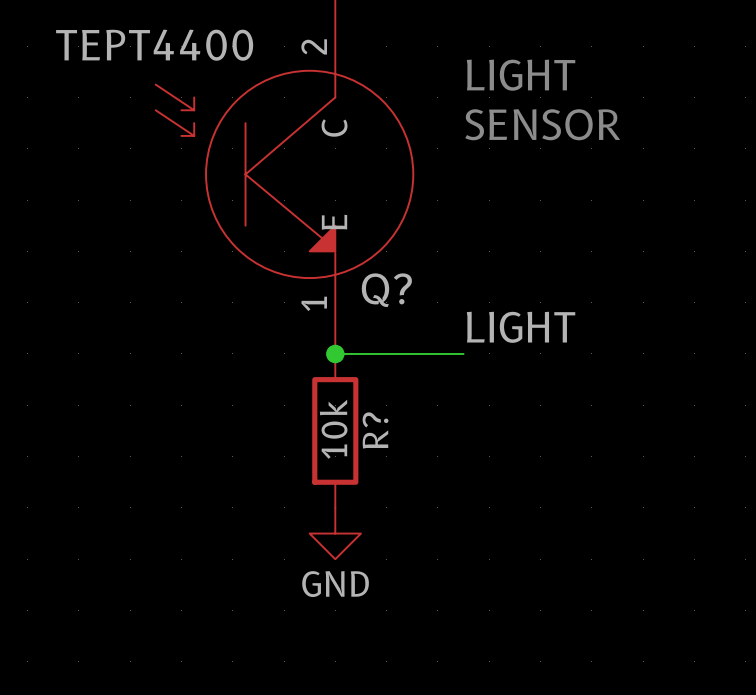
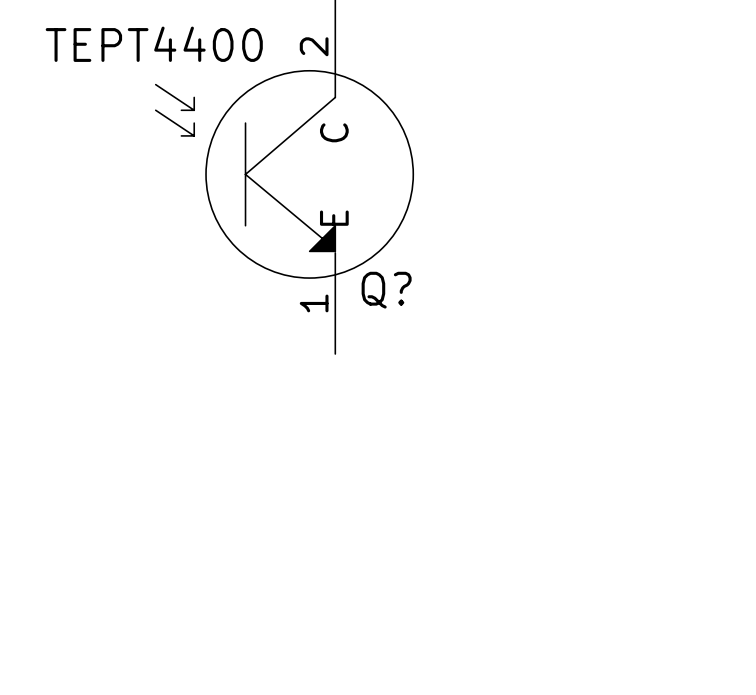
text: LIGHT (521, 75) -> none
text: SENSOR (542, 124) -> none
label: LIGHT (521, 327) -> none
wire: (335, 353) (463, 353) -> none
junction: (335, 353) -> none
R?: 10k (335, 430) -> none
power symbol: GND (335, 533) -> none

